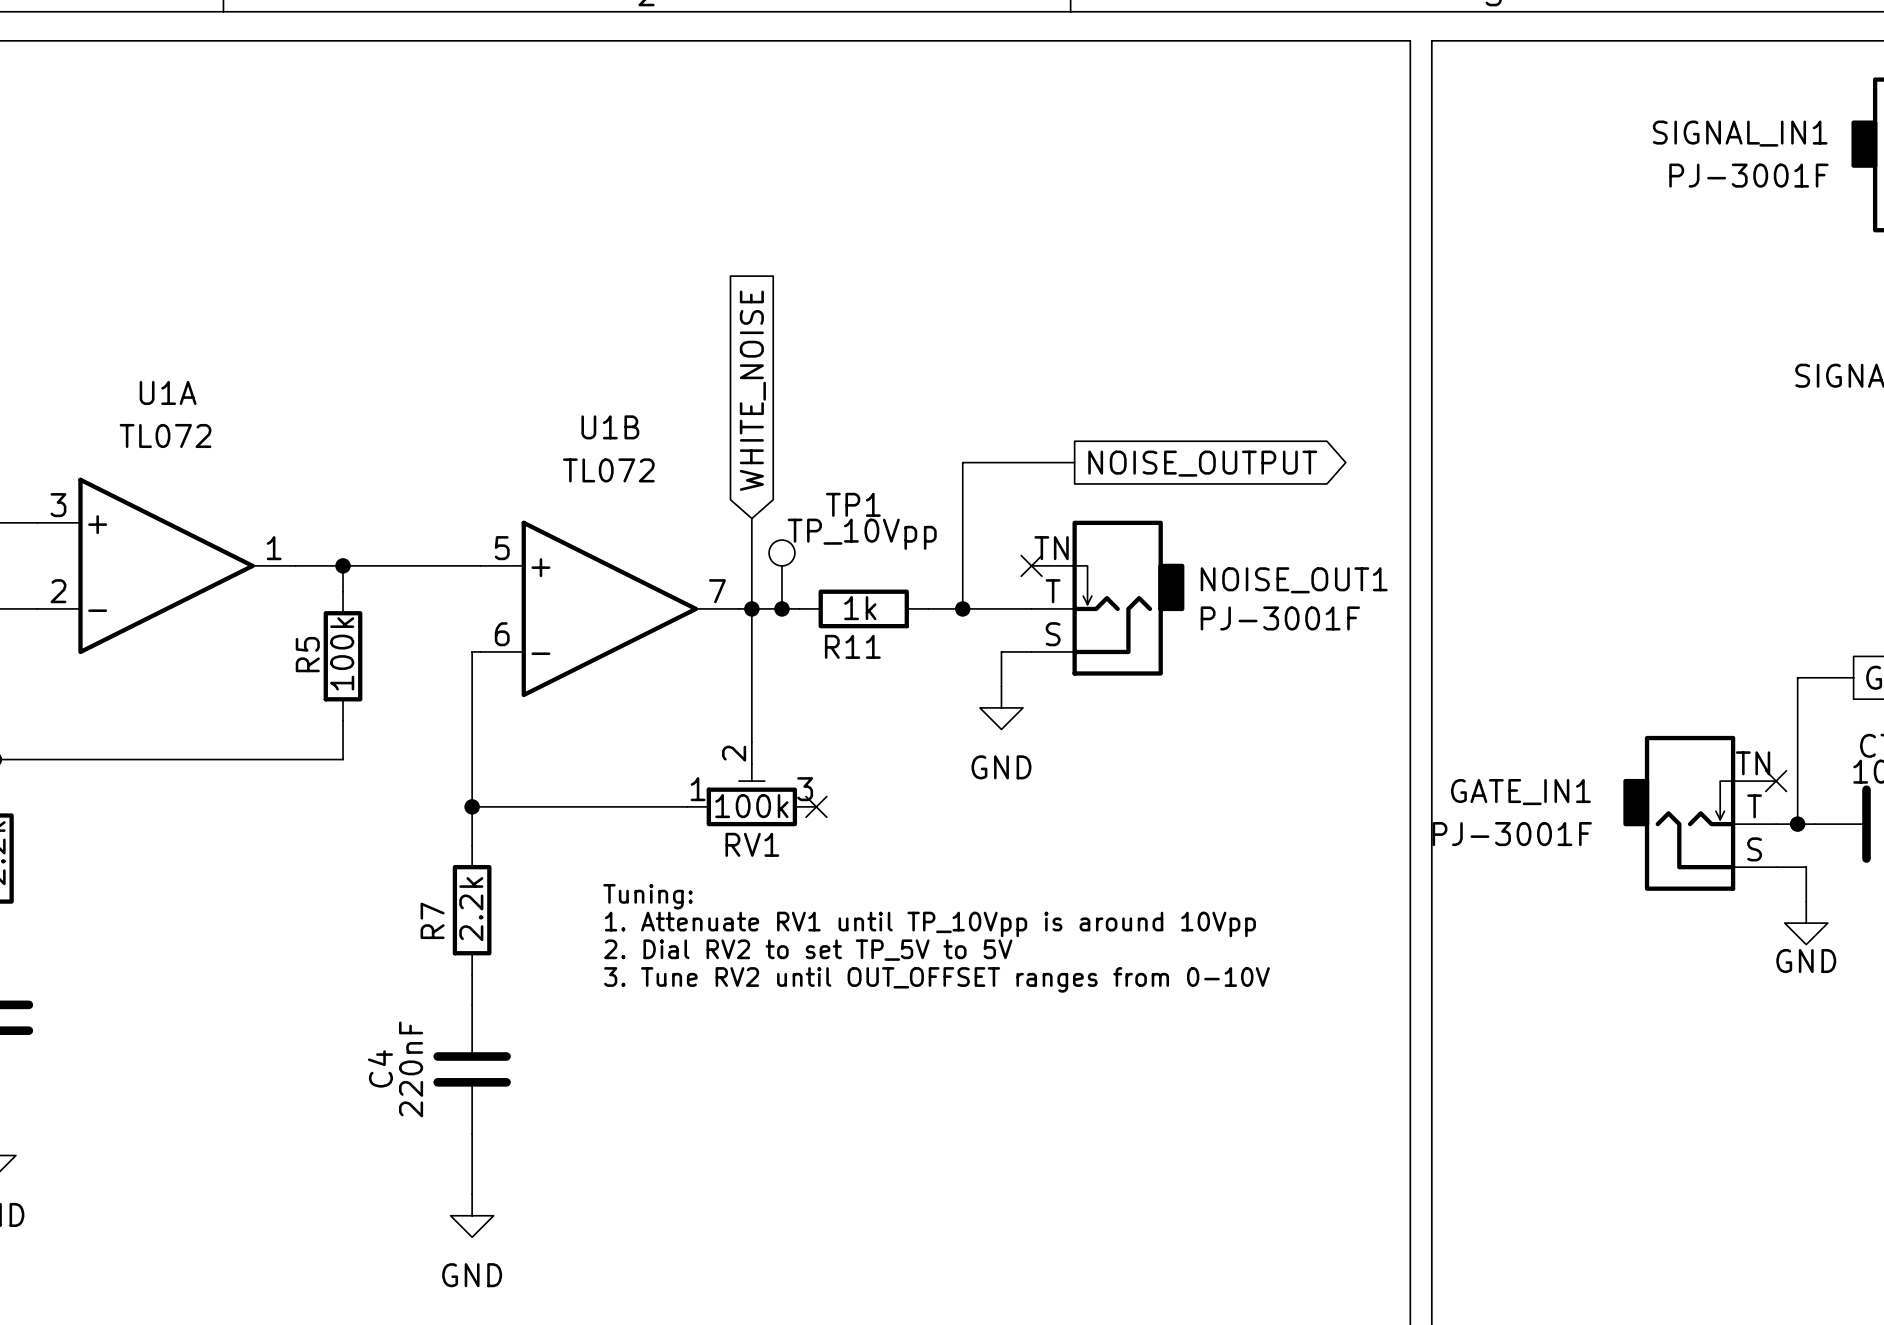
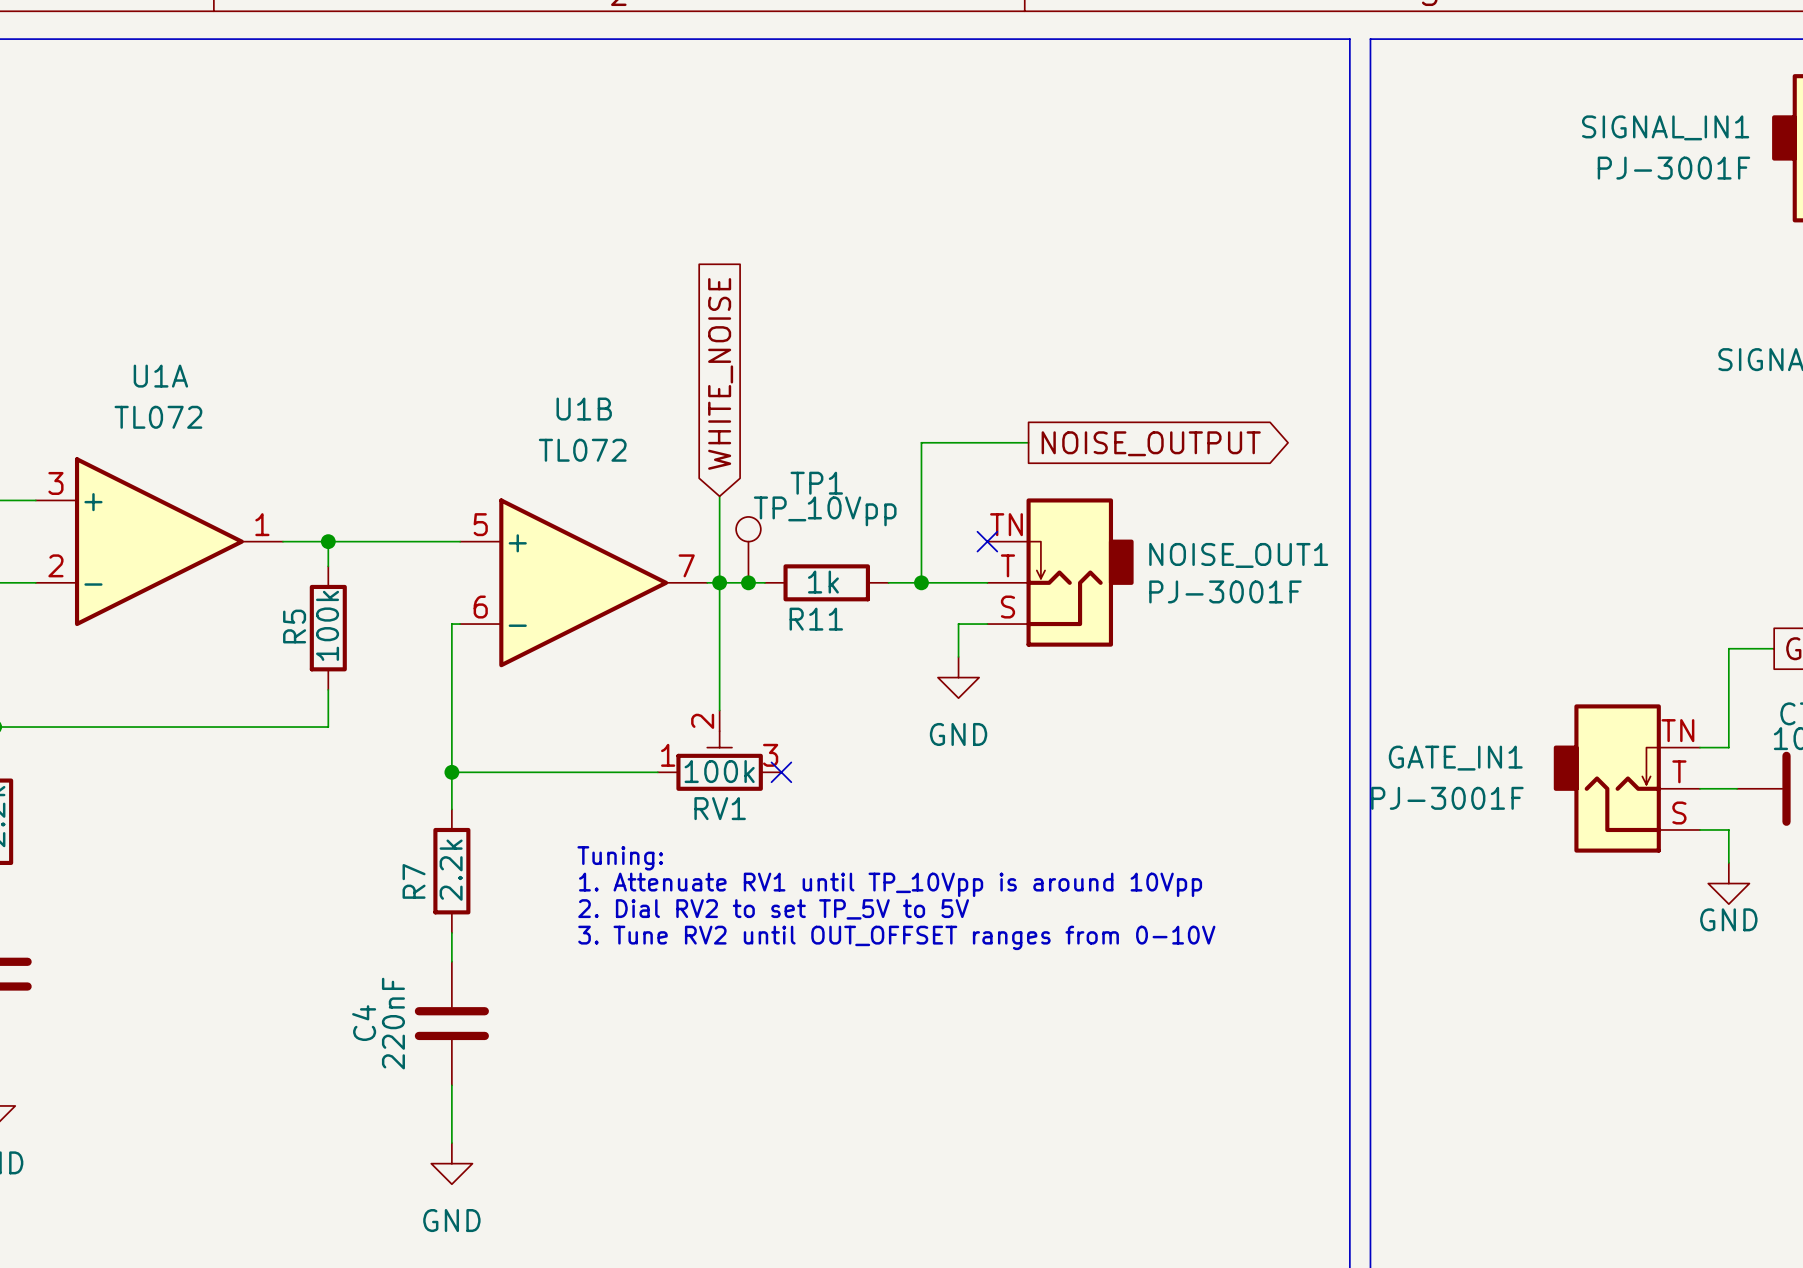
wire: (1806, 677) (1797, 677) (1797, 824) -> (1728, 648) (1728, 747) (1700, 747)
no-connect mark: (1776, 781) -> none
junction: (1797, 824) -> none

